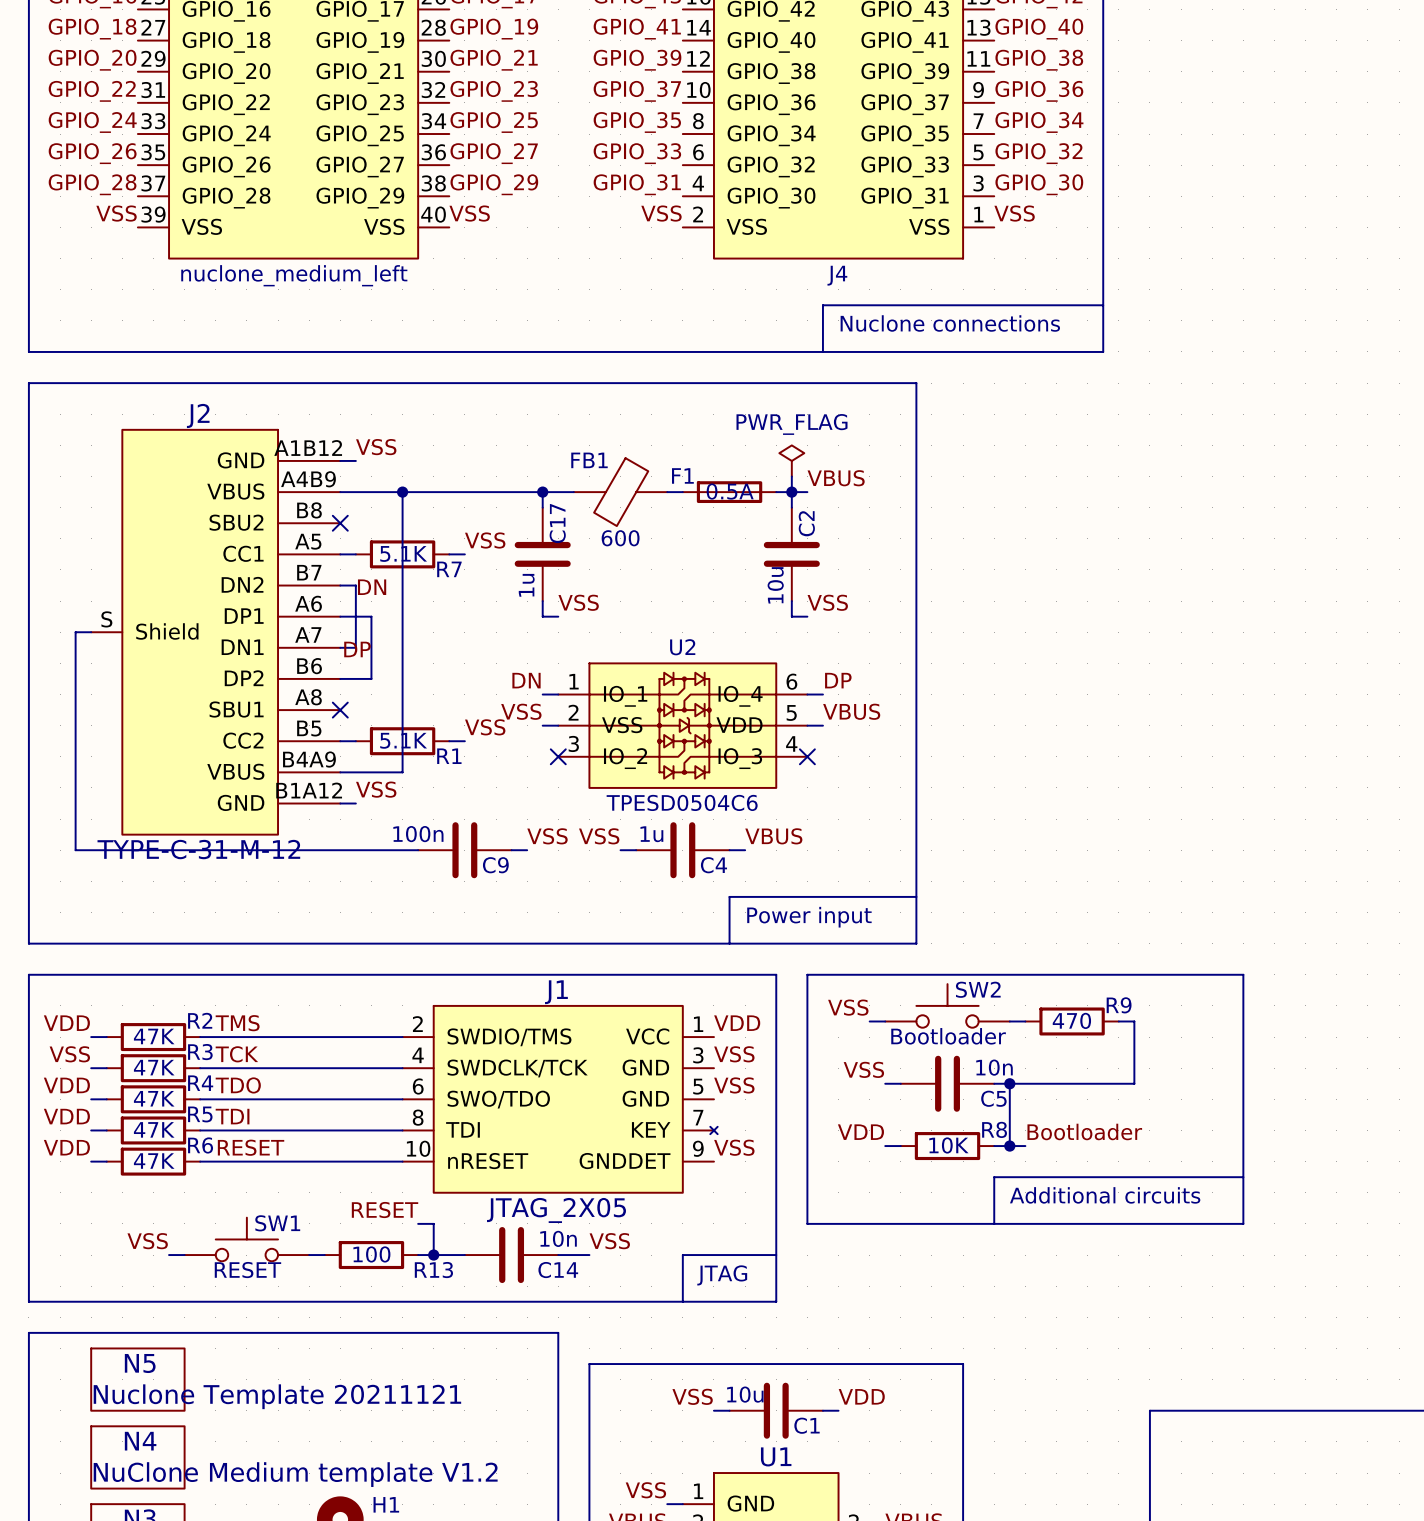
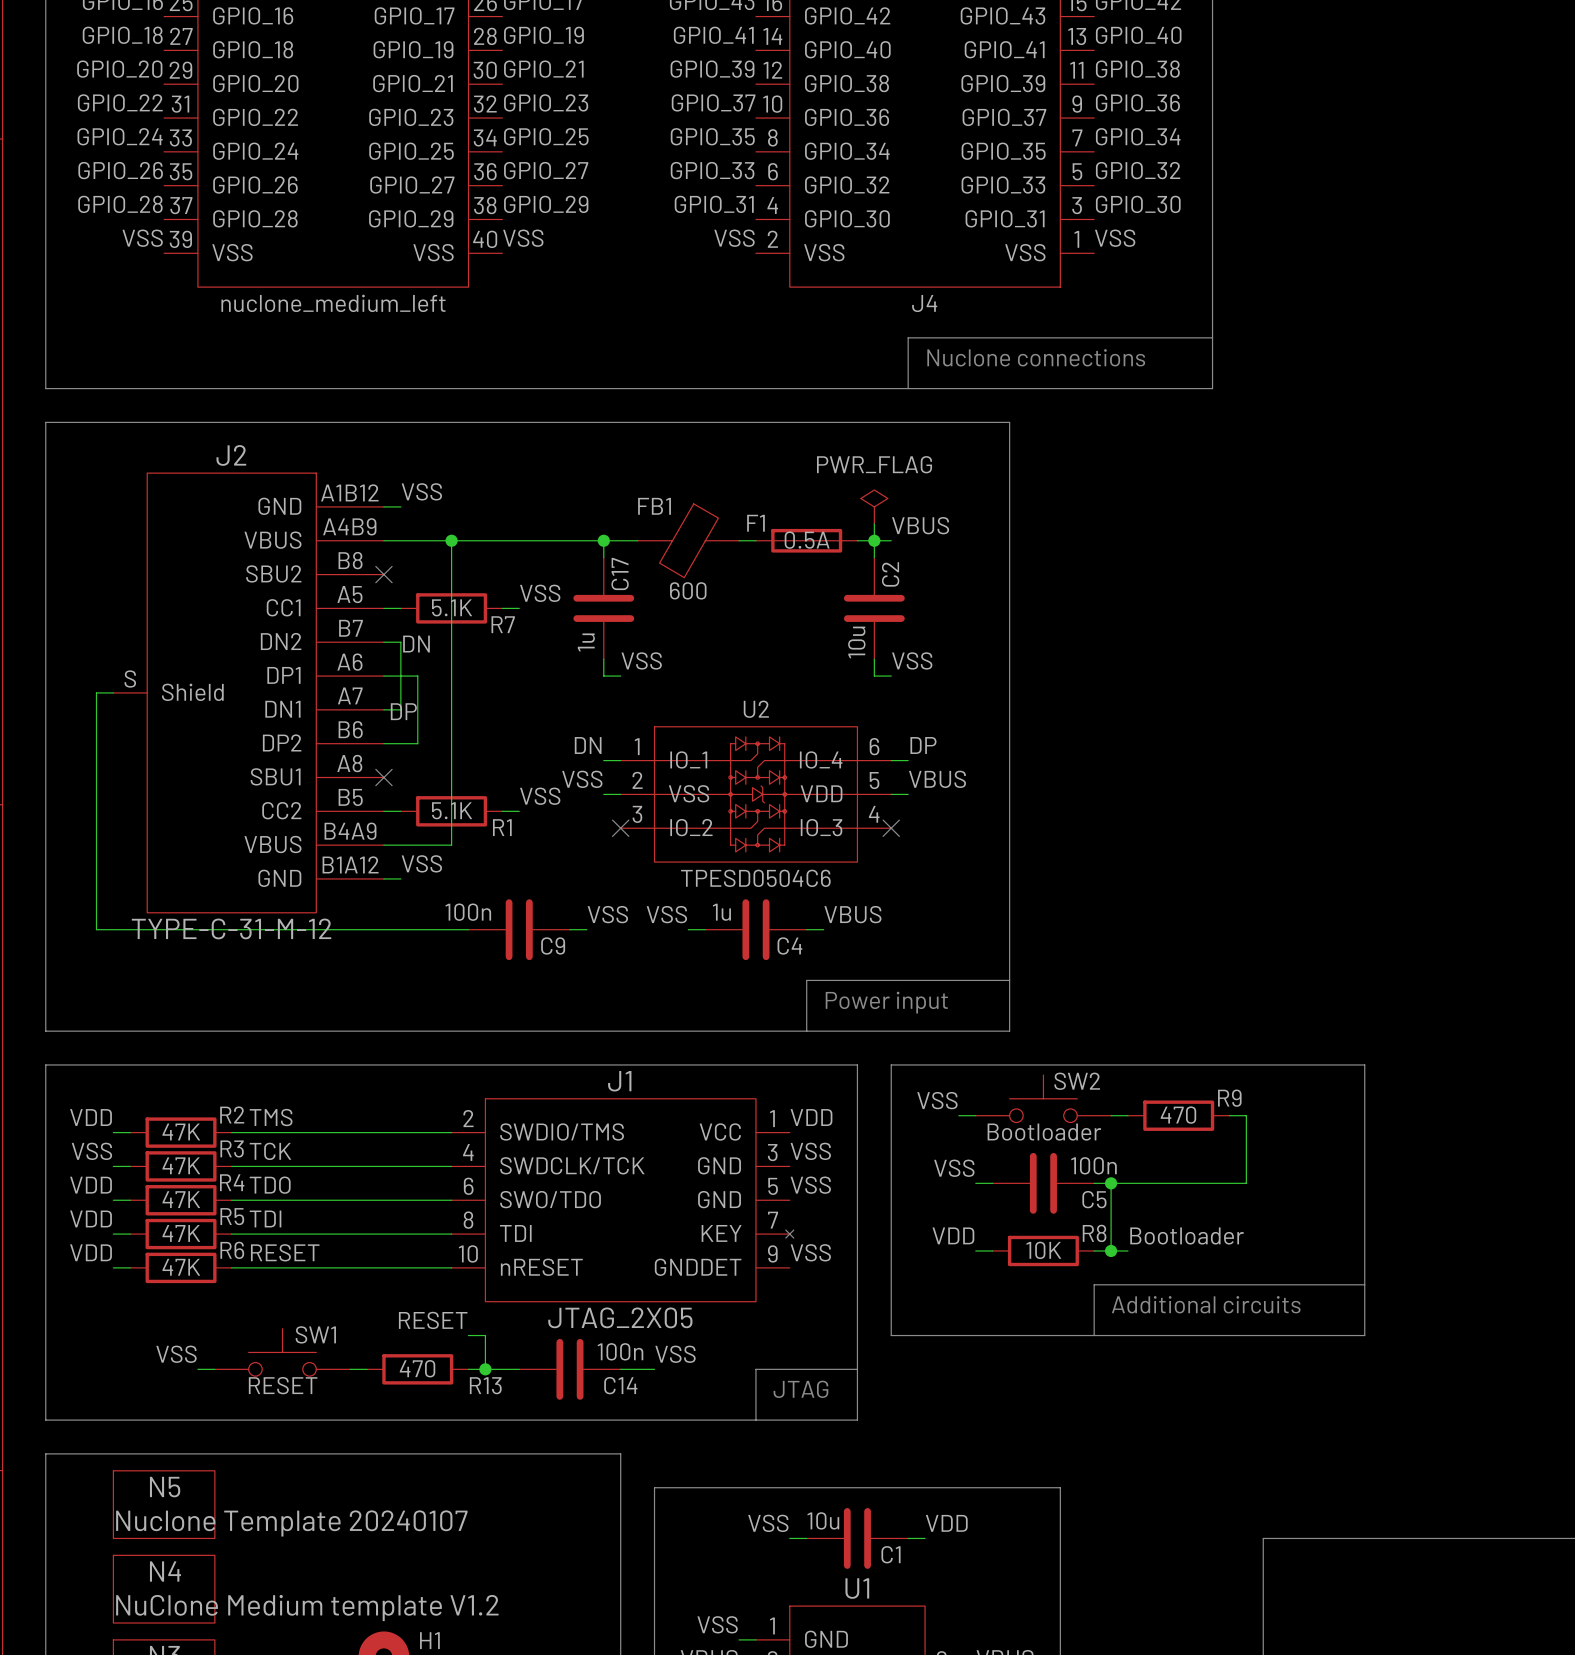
C5 value: 10n (994, 1067) -> 100n (1093, 1165)
C14 value: 10n (558, 1238) -> 100n (620, 1351)
R13 value: 100 (371, 1254) -> 470 (417, 1368)
N5 value: Nuclone Template 20211121 (277, 1396) -> Nuclone Template 20240107 (291, 1523)

